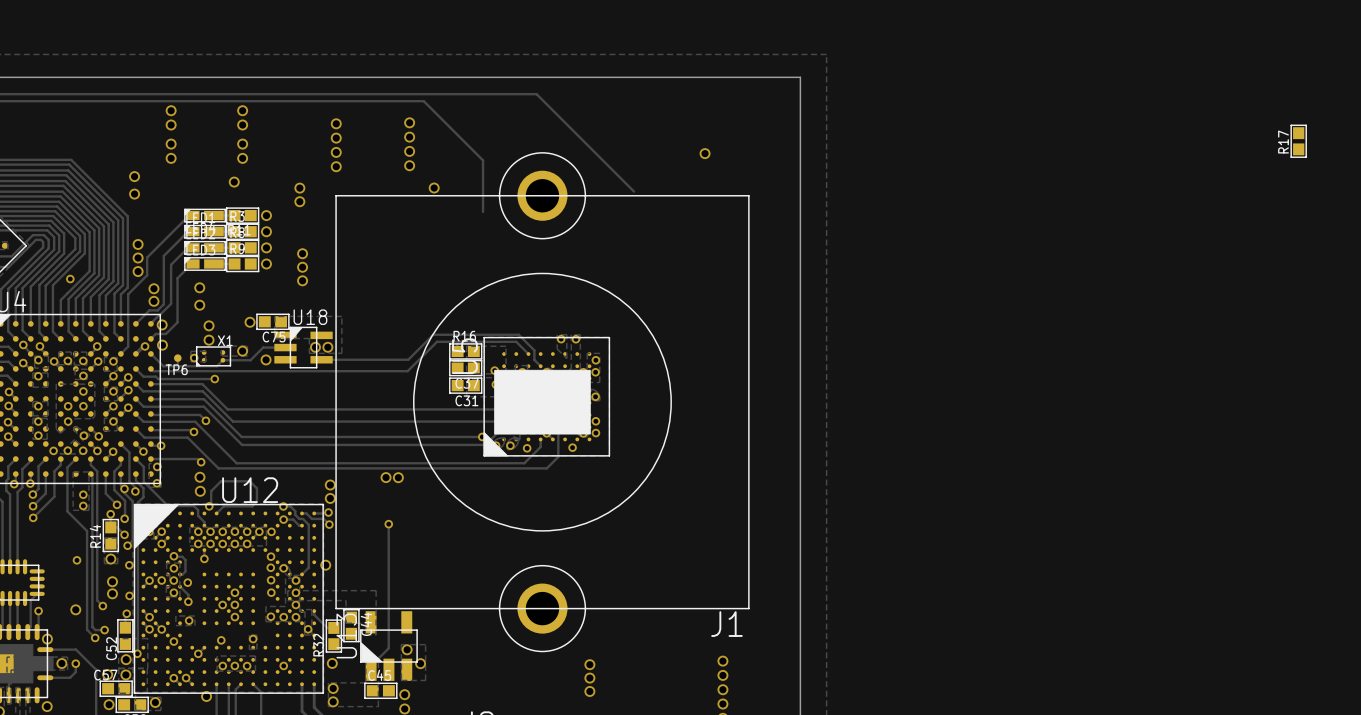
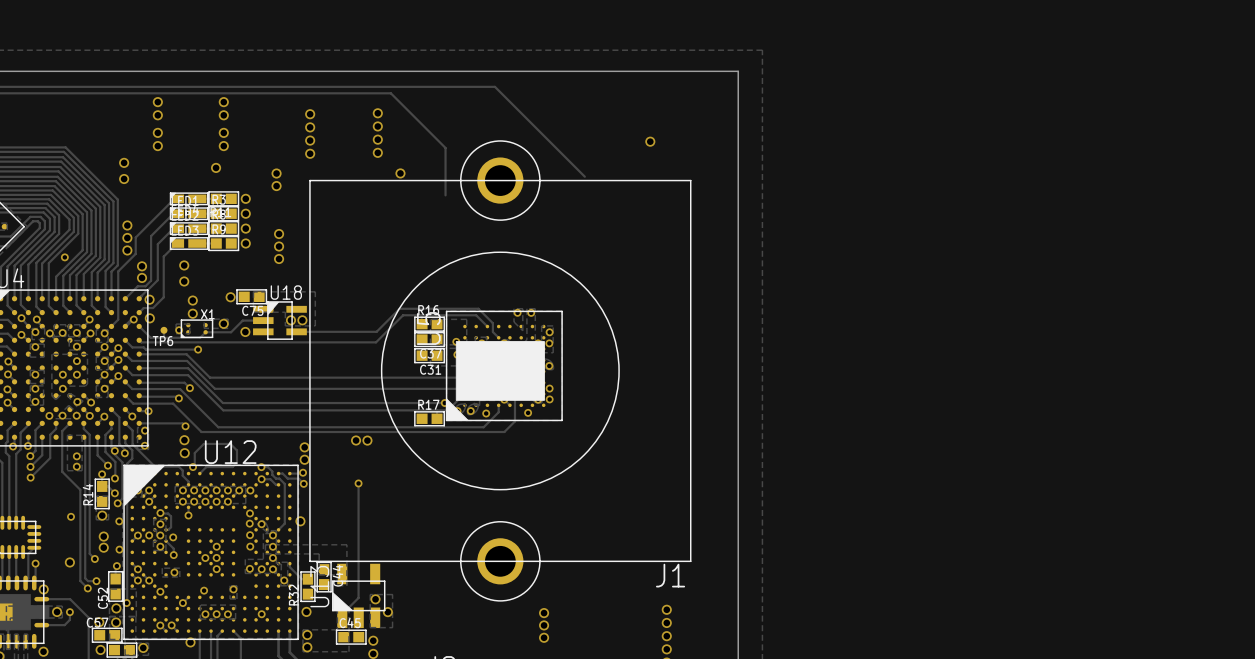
R17 rotation: 0° (1298, 141) -> 90° clockwise (429, 418)
R17 position: (1298, 141) -> (429, 418)

